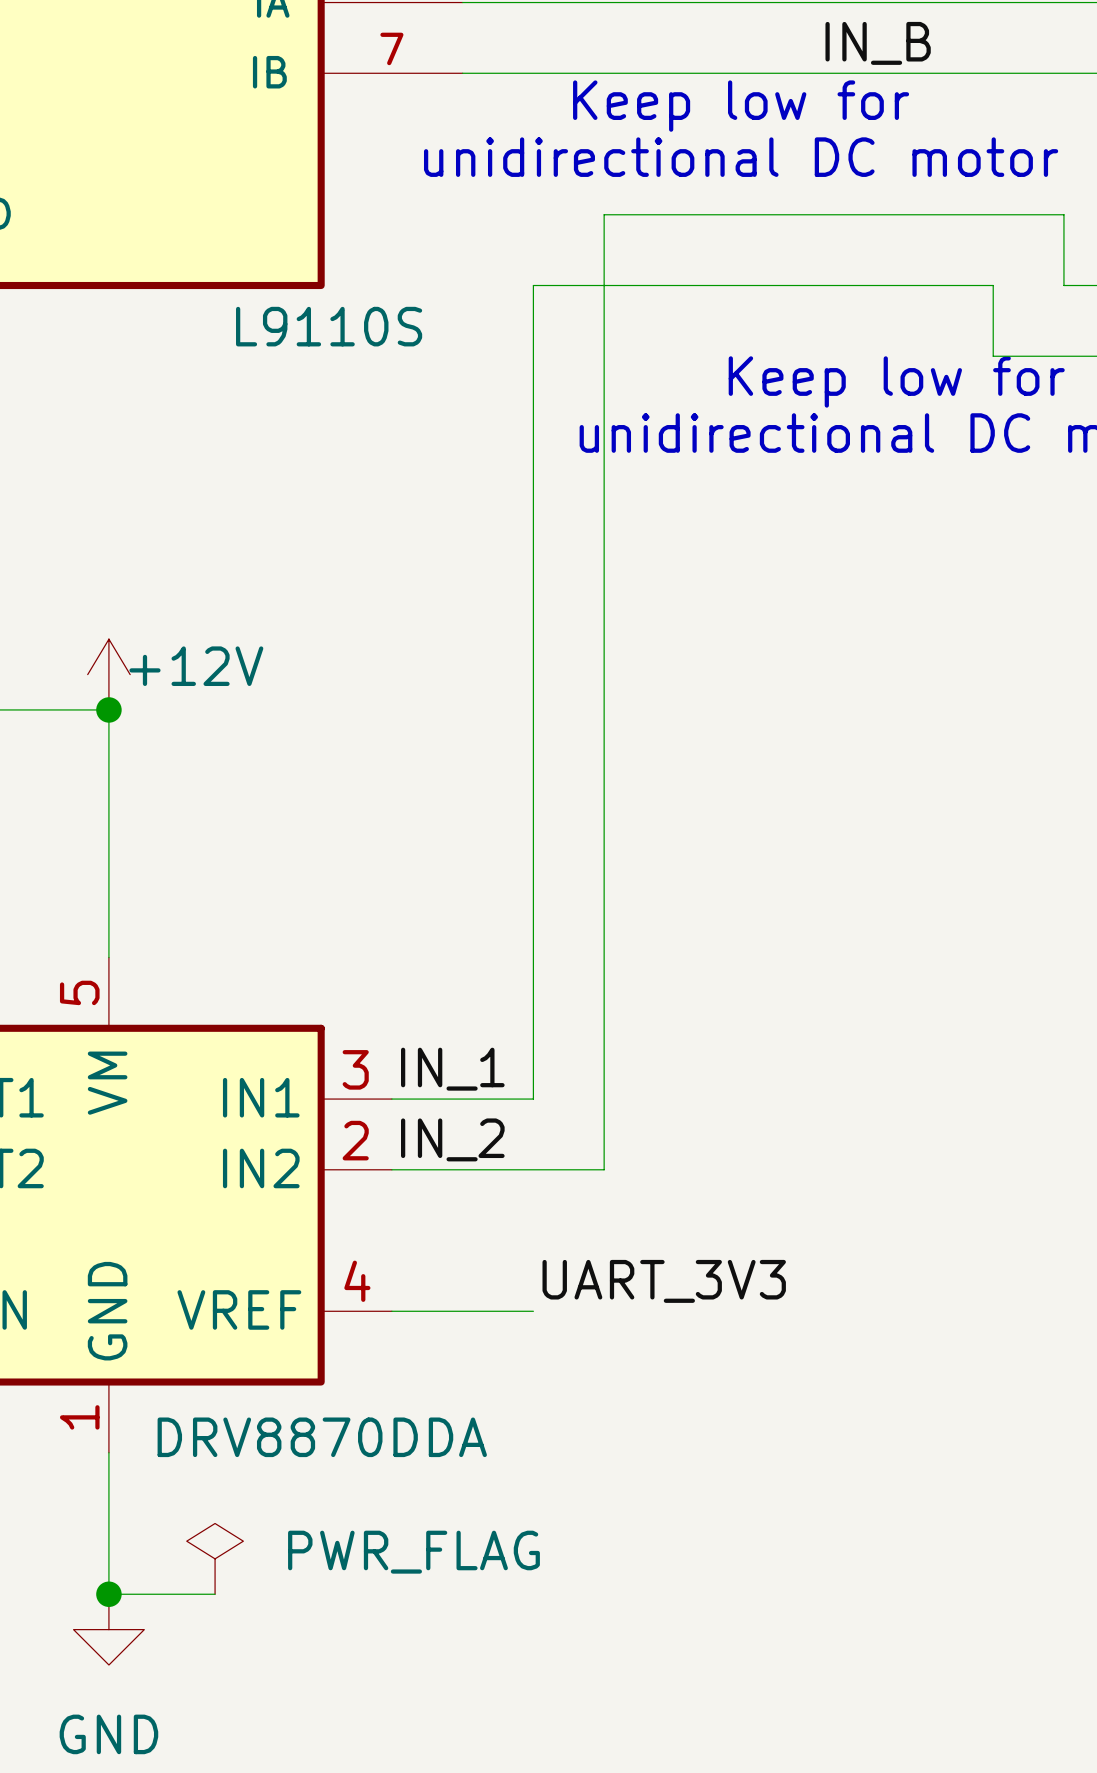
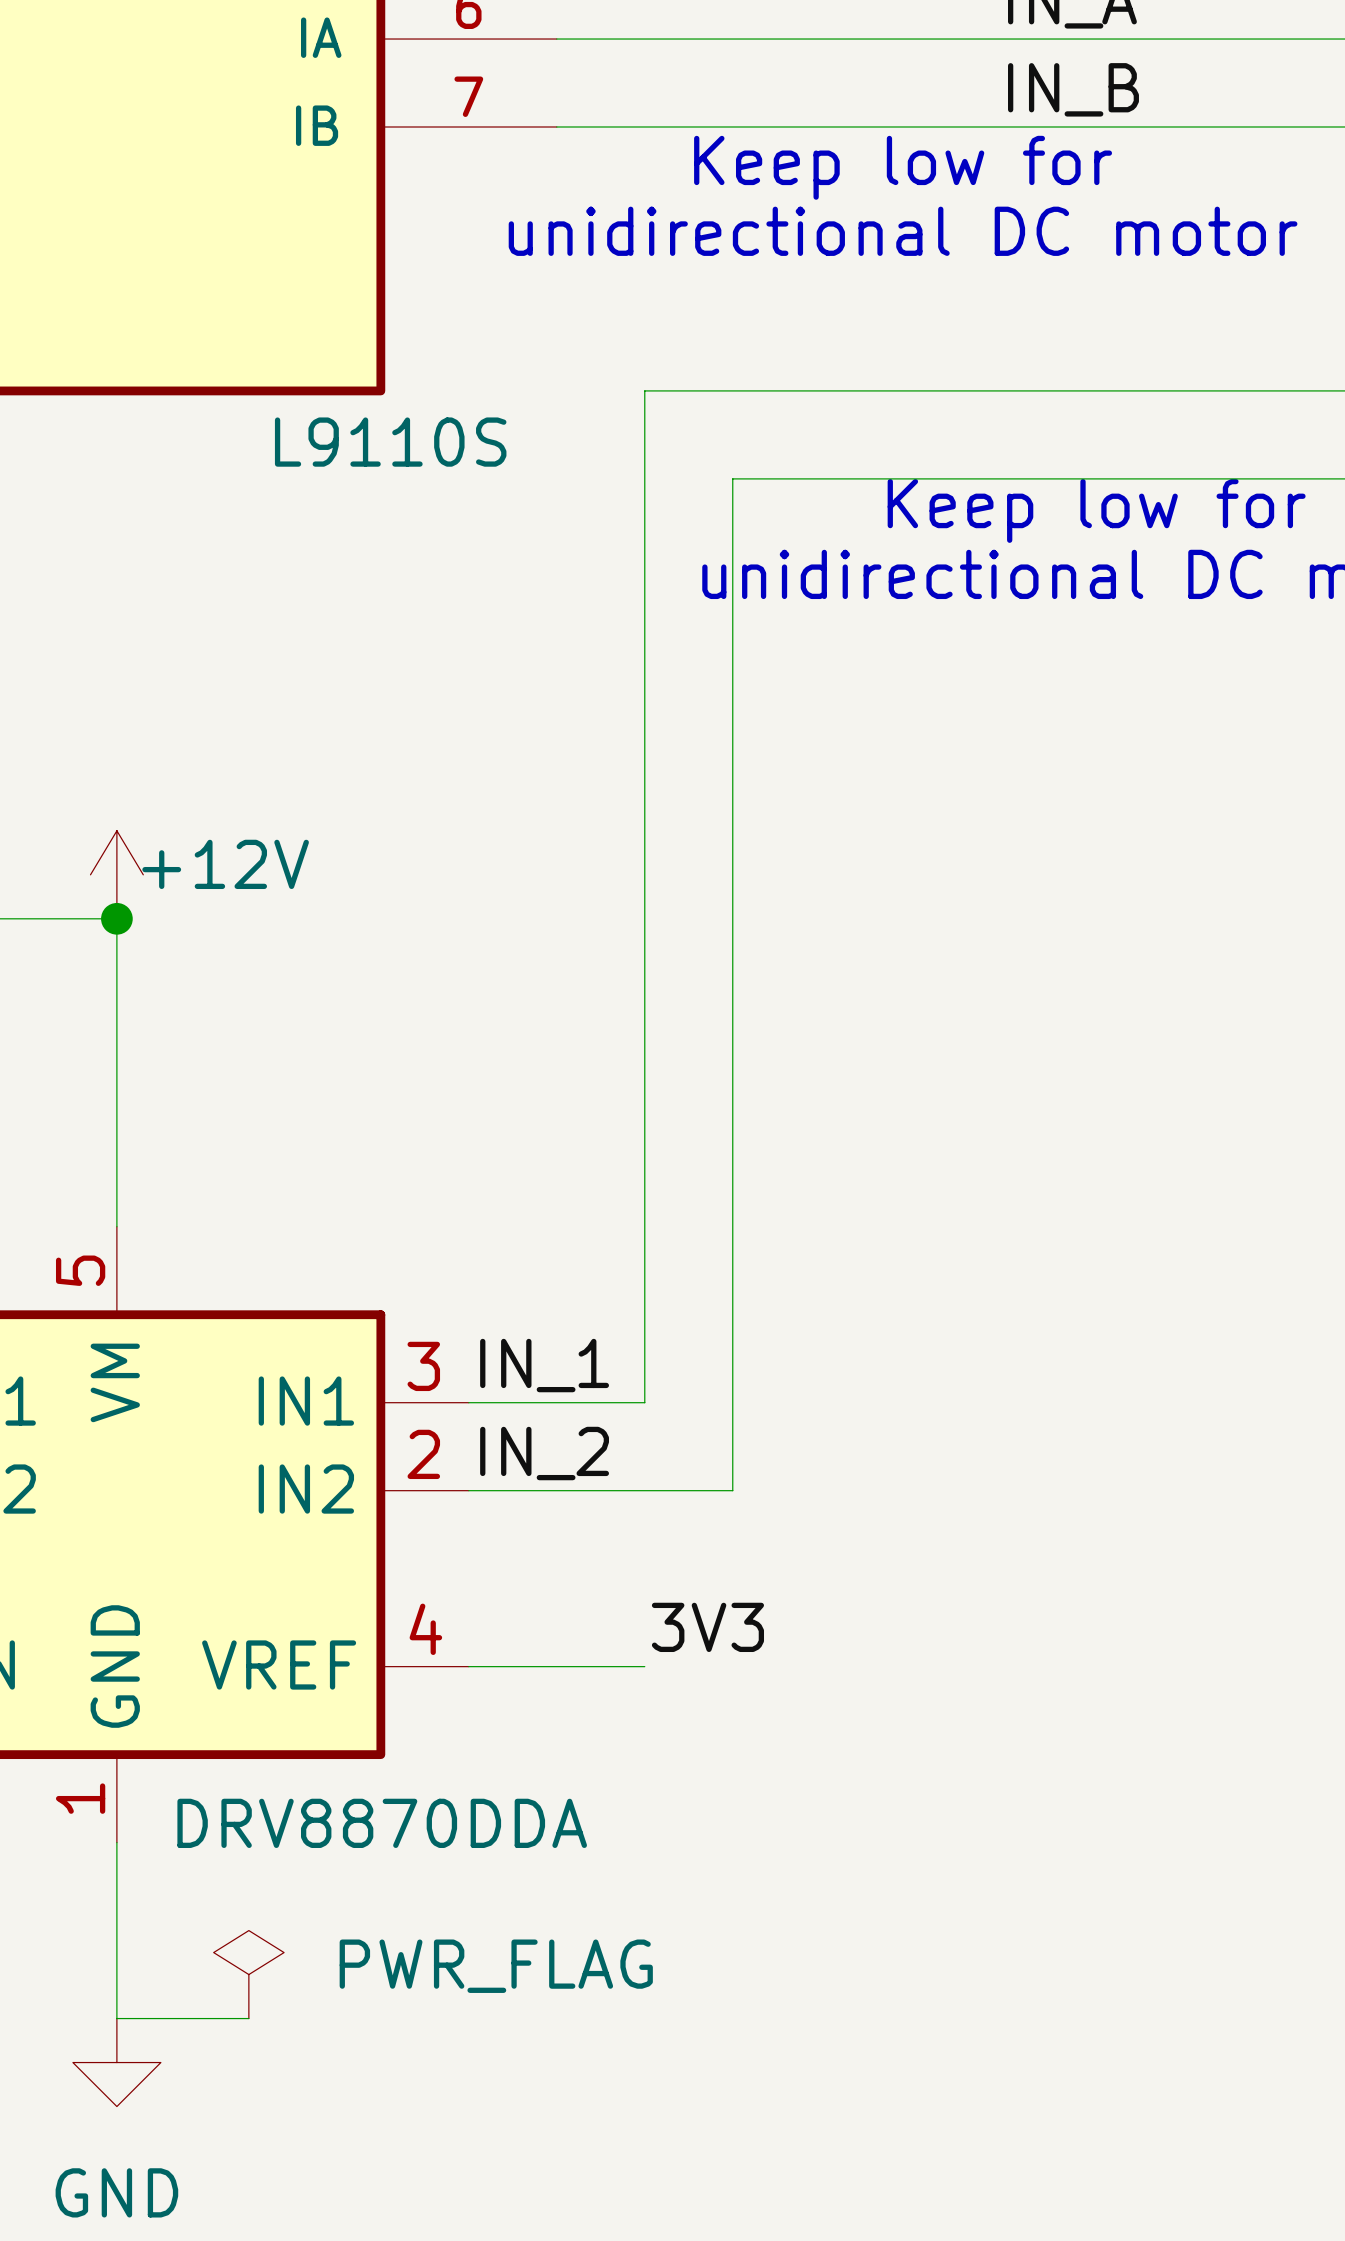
wire: (993, 285) (993, 356) -> (1216, 390) (1304, 390)
wire: (1063, 285) (1063, 214) (604, 214) (604, 356) -> (1216, 478) (732, 478)
label: UART_3V3 (664, 1281) -> 3V3 (707, 1627)
junction: (108, 1594) -> none

